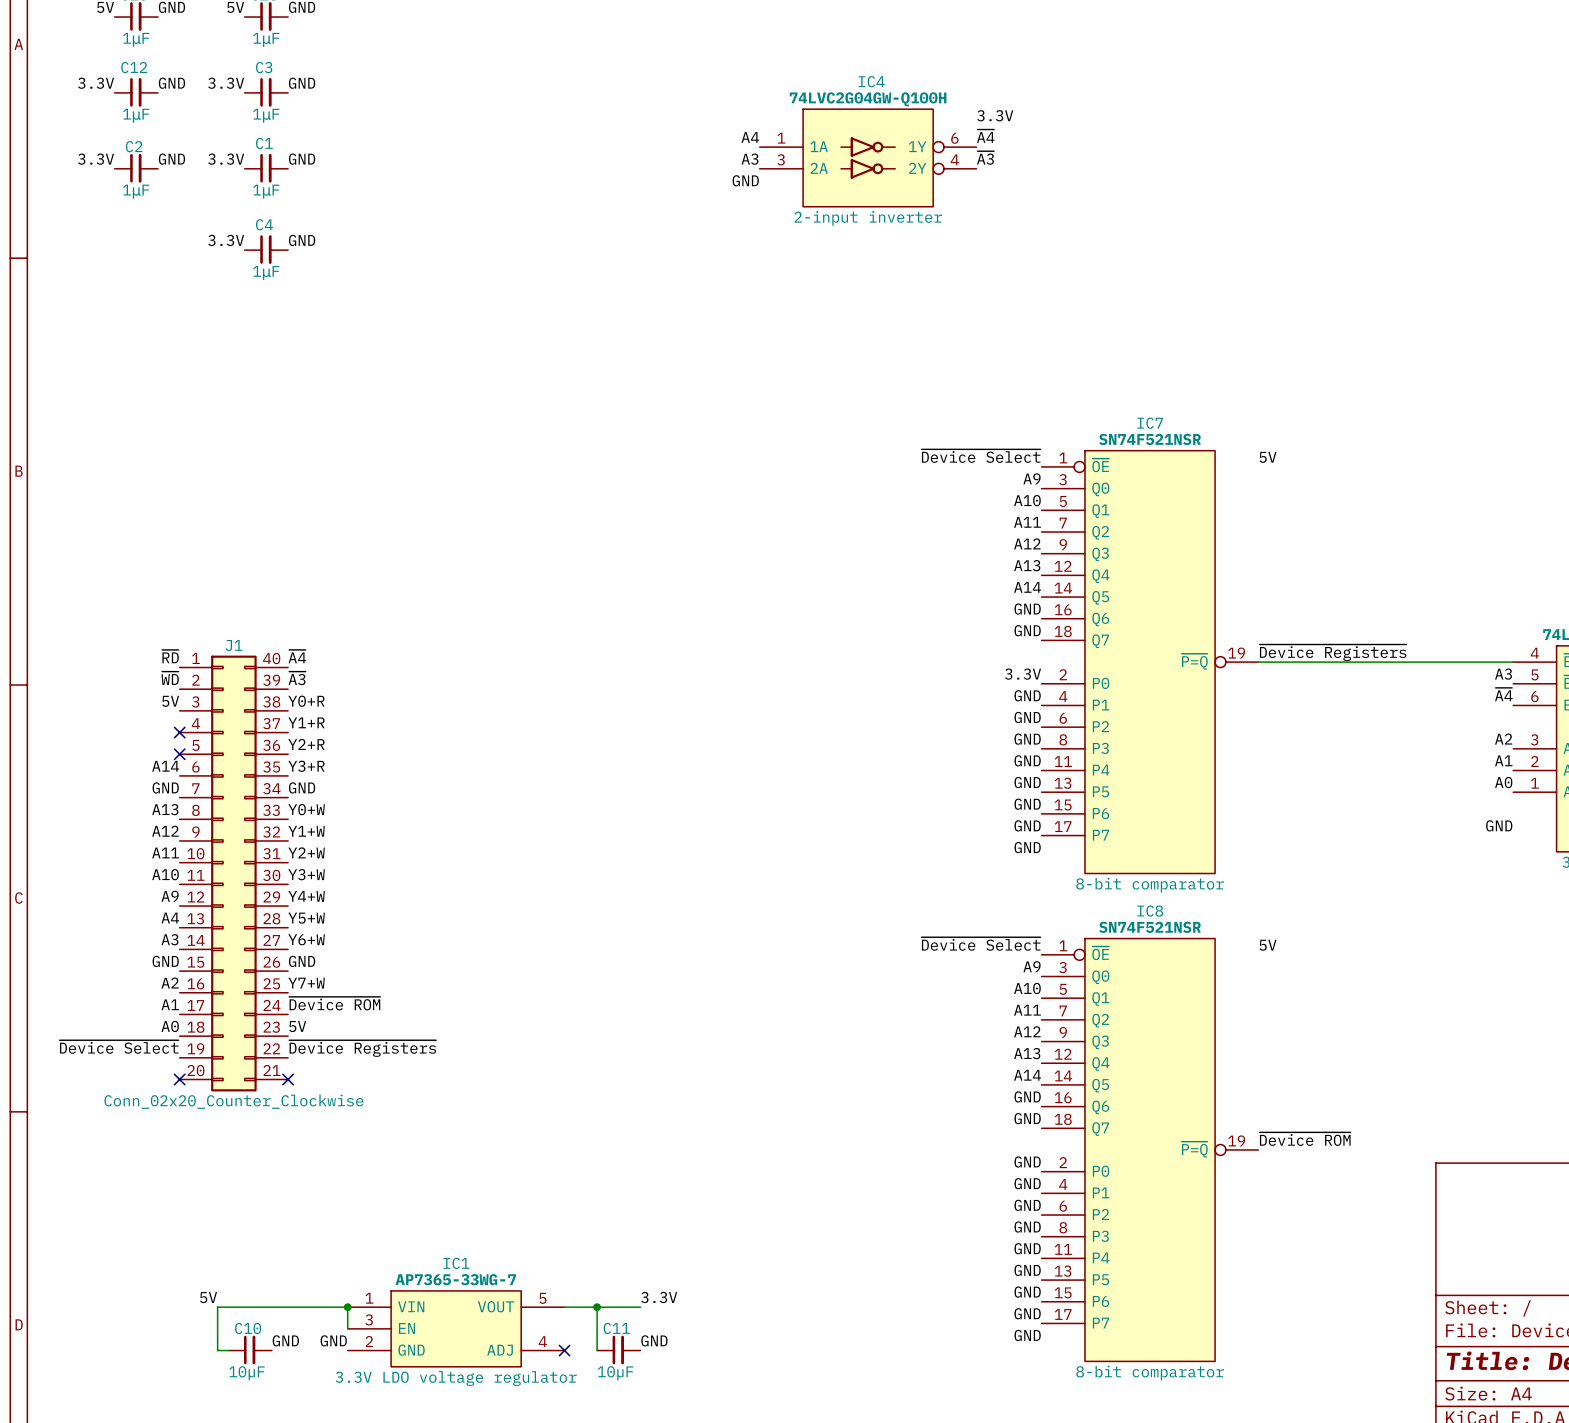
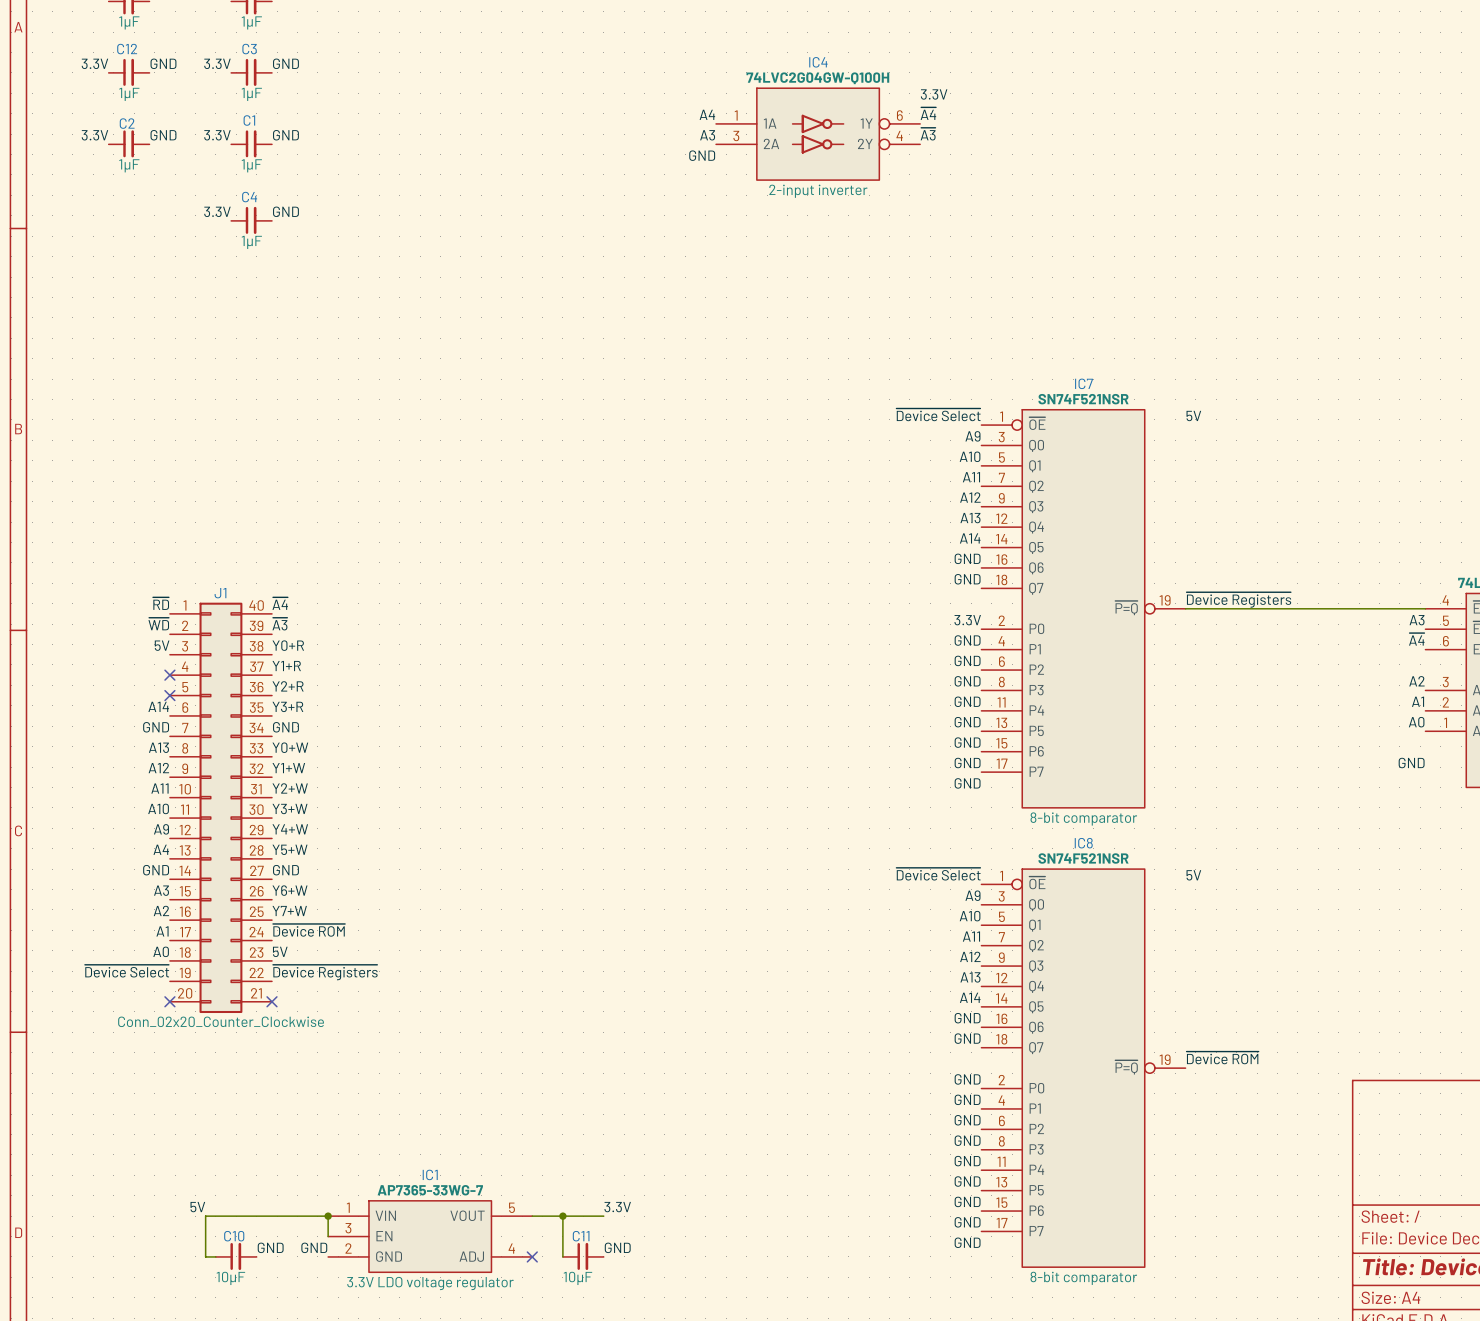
label: A3 (169, 939) -> GND (156, 870)
label: Y6+W (306, 939) -> GND (285, 870)
label: GND (165, 961) -> A3 (161, 890)
label: GND (302, 961) -> Y6+W (290, 890)

